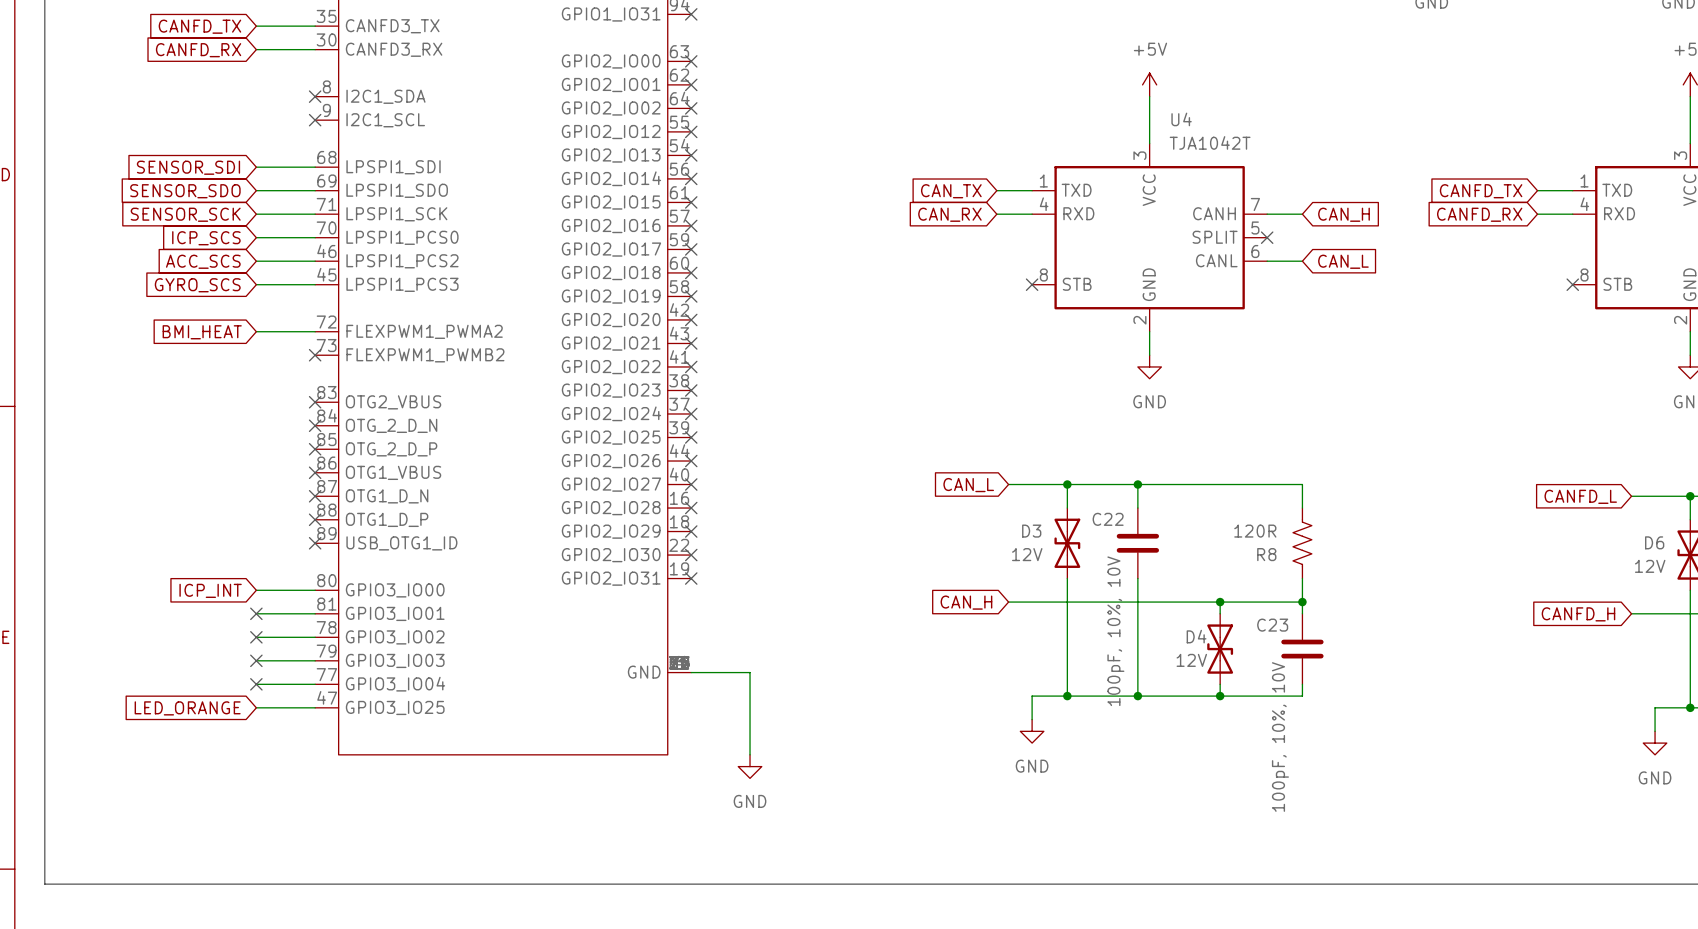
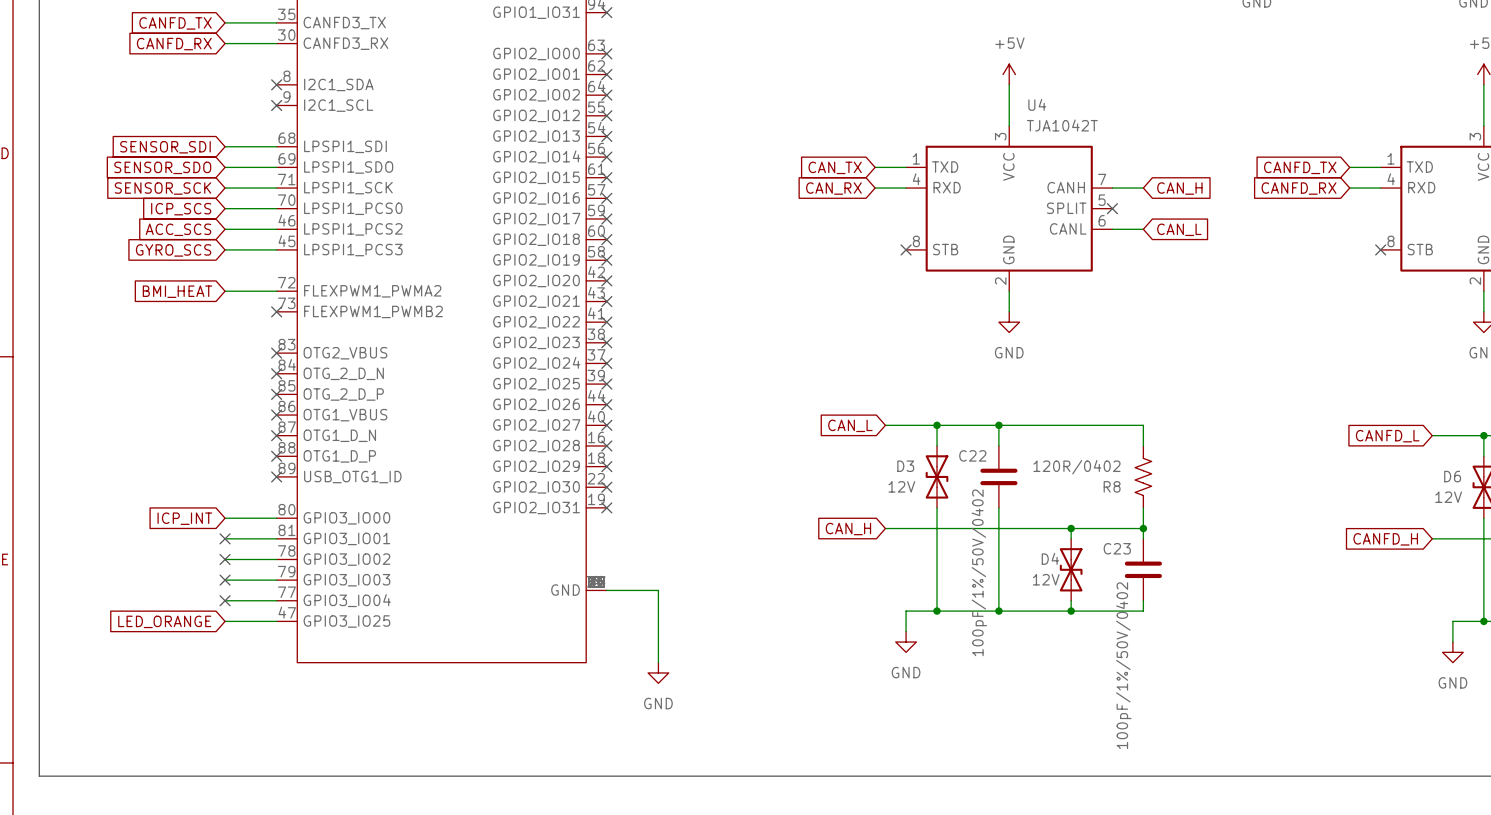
R8 value: 120R (1255, 531) -> 120R/0402 (1076, 467)
C22 value: 100pF, 10%, 10V (1115, 631) -> 100pF/1%/50V/0402 (979, 572)
C23 value: 100pF, 10%, 10V (1280, 737) -> 100pF/1%/50V/0402 (1123, 665)

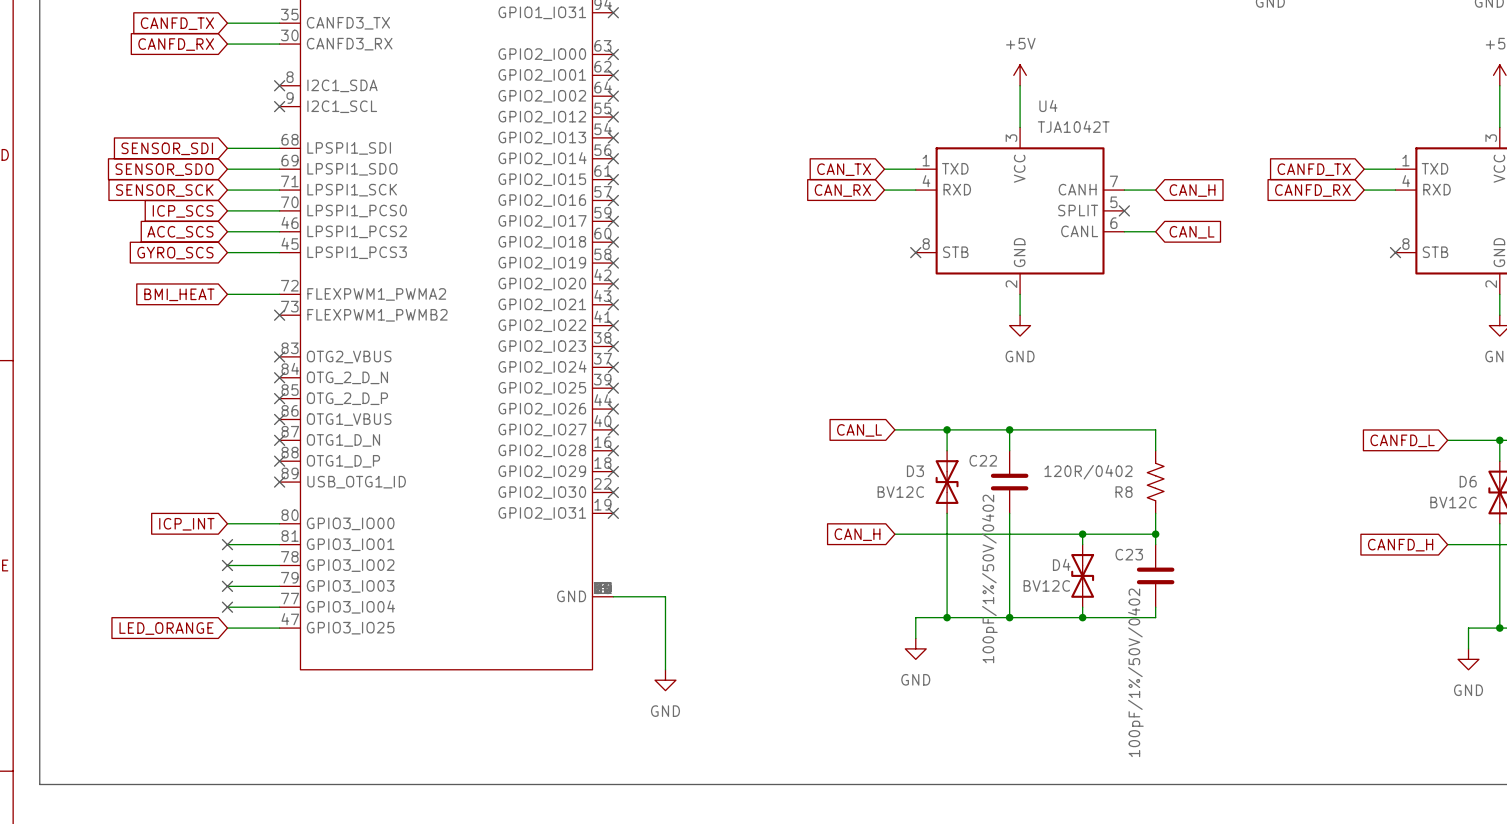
D3 value: 12V (901, 486) -> BV12C (900, 492)
D6 value: 12V (1448, 497) -> BV12C (1453, 502)
D4 value: 12V (1046, 579) -> BV12C (1046, 585)

